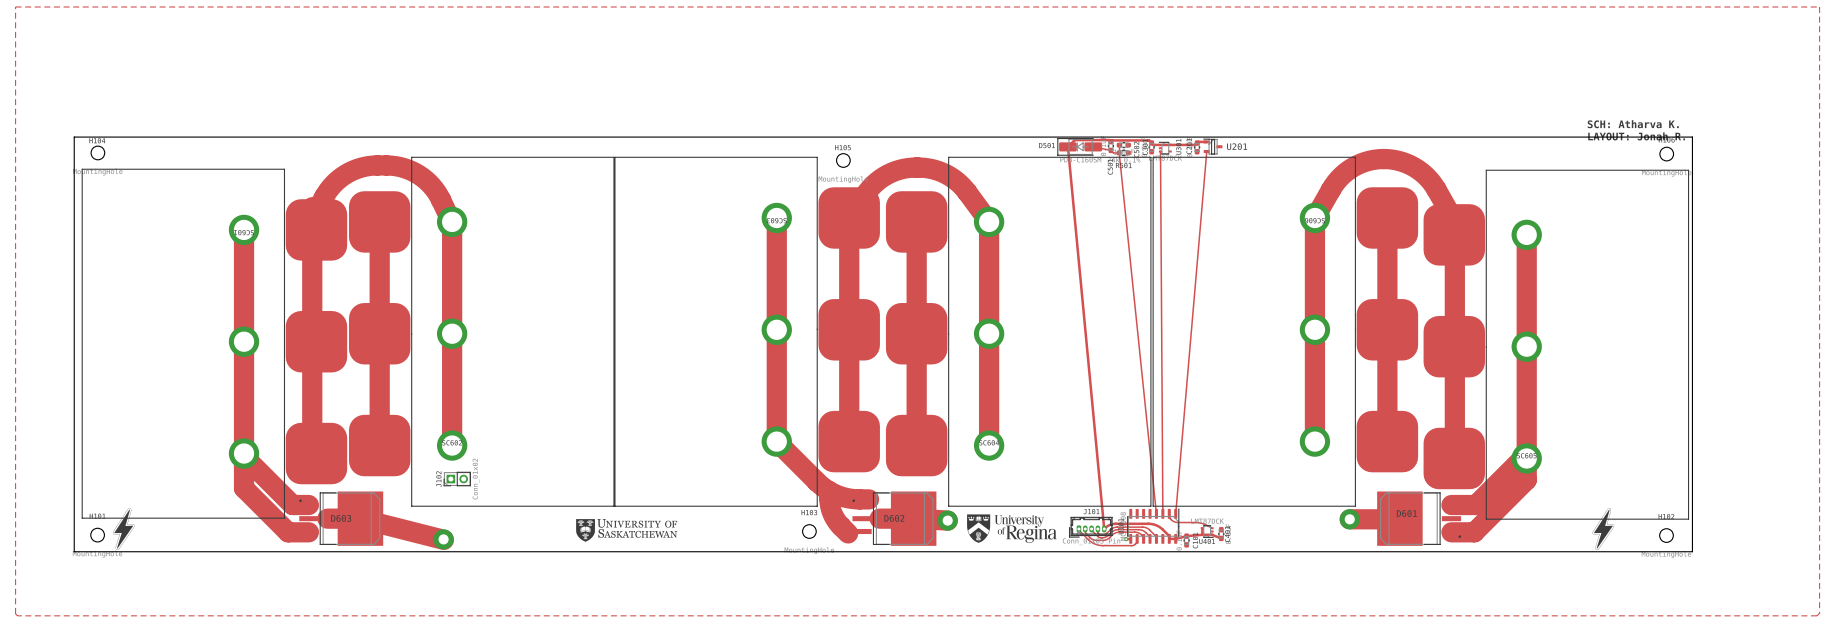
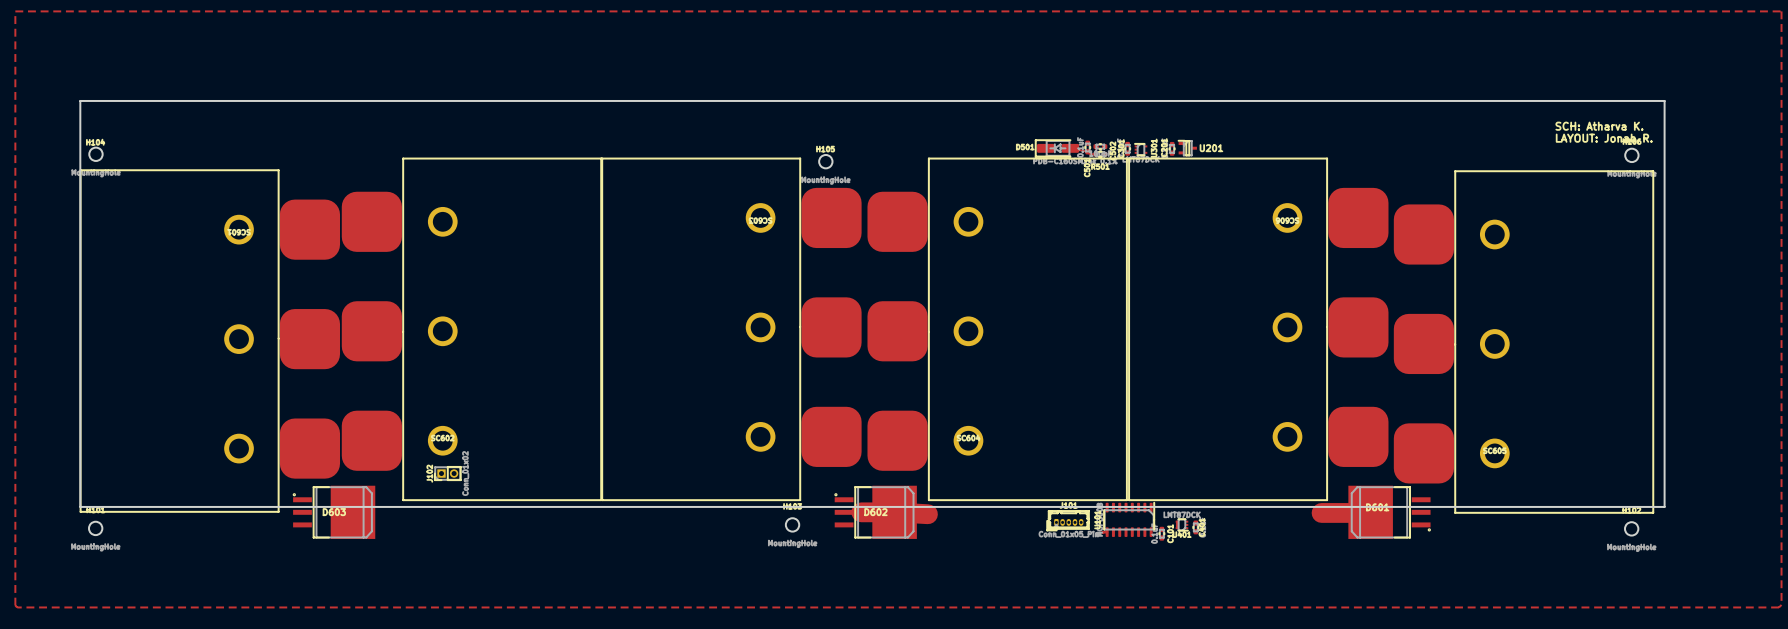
board edge: (74, 137) (1692, 137) (1692, 551) (74, 551) (74, 137) -> (80, 100) (1664, 100) (1664, 506) (80, 506) (80, 100)
track: (1206, 141) (1198, 141) (1195, 144) (1153, 144) (1149, 140) (1074, 140) (1067, 146) (1104, 528) (1113, 523) (1150, 523) (1161, 528) (1169, 536) (1169, 538) (1202, 534) (1211, 534) (1221, 538) -> none
track: (1160, 151) (1162, 513) -> none
track: (1206, 151) (1175, 513) -> none
track: (1119, 152) (1156, 513) -> none
track: (312, 207) (312, 442) -> none
track: (1387, 217) (1387, 441) -> none
track: (312, 219) (333, 184) (346, 174) (365, 166) (390, 165) (407, 169) (425, 179) (436, 192) (452, 223) (452, 446) -> none
track: (776, 219) (776, 442) -> none
track: (379, 221) (379, 445) -> none
track: (916, 221) (916, 445) -> none
track: (989, 221) (964, 189) (955, 180) (938, 170) (918, 167) (899, 169) (880, 178) (868, 190) (849, 217) (849, 441) -> none
track: (989, 223) (989, 446) -> none
track: (244, 229) (244, 488) (288, 532) (308, 532) -> none
track: (1526, 234) (1526, 454) (1475, 505) (1451, 505) -> none
track: (776, 441) (826, 489) (844, 497) (869, 499) -> none
track: (1314, 441) (1314, 217) (1333, 185) (1345, 172) (1365, 161) (1383, 159) (1406, 163) (1425, 175) (1434, 185) (1454, 221) (1454, 445) -> none
track: (244, 456) (292, 505) (308, 505) -> none
track: (1526, 458) (1526, 479) (1474, 532) (1451, 532) -> none
track: (829, 491) (832, 513) (848, 533) -> none
drawing: [112, 508, 135, 550] -> none
drawing: [1592, 508, 1615, 550] -> none
track: (1169, 513) (1169, 517) (1175, 522) (1199, 522) (1211, 528) -> none
drawing: [967, 514, 1057, 543] -> none
track: (327, 518) (360, 518) (443, 539) -> none
drawing: [576, 519, 678, 542] -> none
via: (1349, 519) -> none
via: (947, 520) -> none
track: (1078, 528) (1090, 541) (1100, 545) (1132, 545) (1136, 543) (1137, 538) -> none
track: (1085, 528) (1086, 534) (1095, 540) (1105, 539) (1119, 532) (1137, 532) (1143, 538) -> none
track: (1091, 528) (1101, 537) (1116, 529) (1140, 529) (1145, 532) (1150, 538) -> none
track: (1097, 528) (1097, 532) (1102, 535) (1115, 527) (1143, 527) (1149, 530) (1156, 538) -> none
via: (443, 539) -> none
via: (1126, 539) -> none

